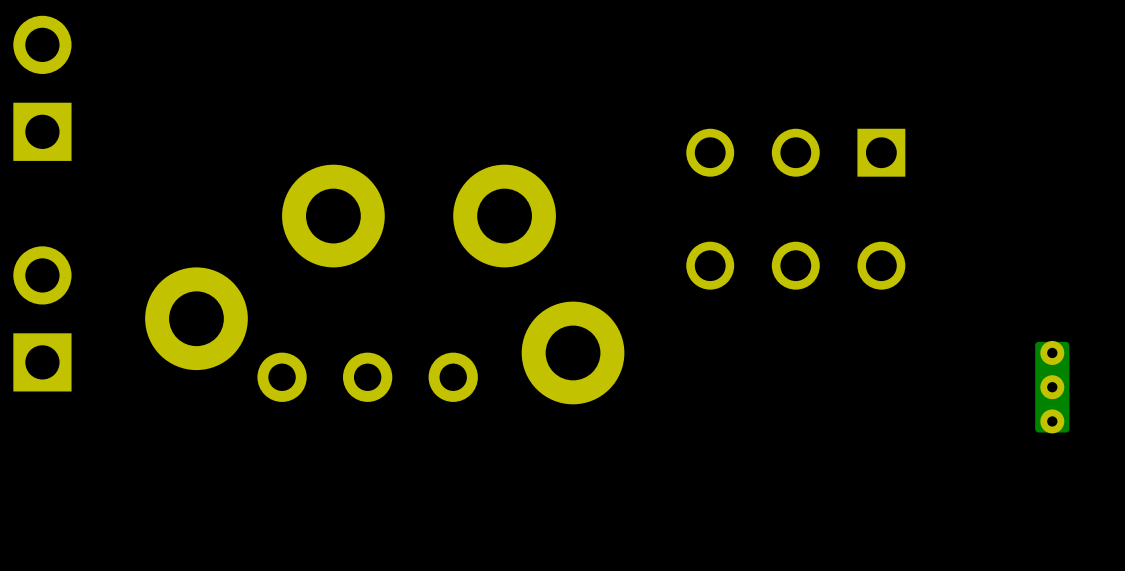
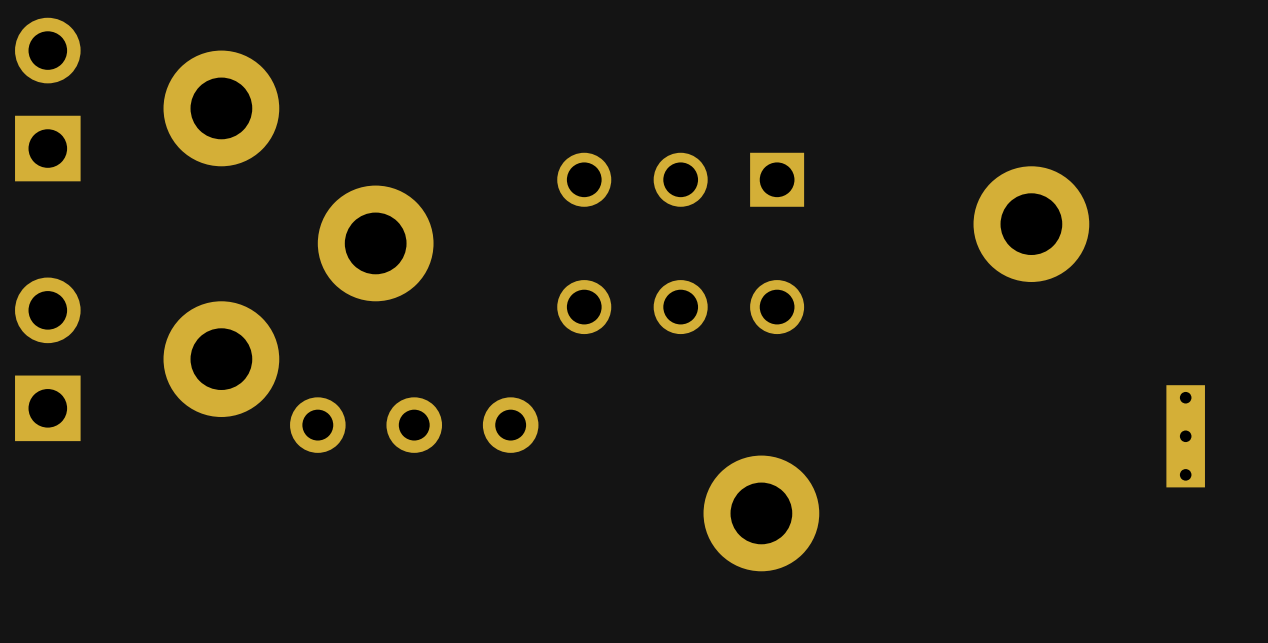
part: none -> (221, 108)
part: none -> (1031, 224)
part position: (795, 209) -> (680, 243)
part: (504, 216) -> none
part footprint: [1035, 340, 1070, 434] -> [1166, 385, 1205, 488]
part position: (573, 352) -> (761, 513)

